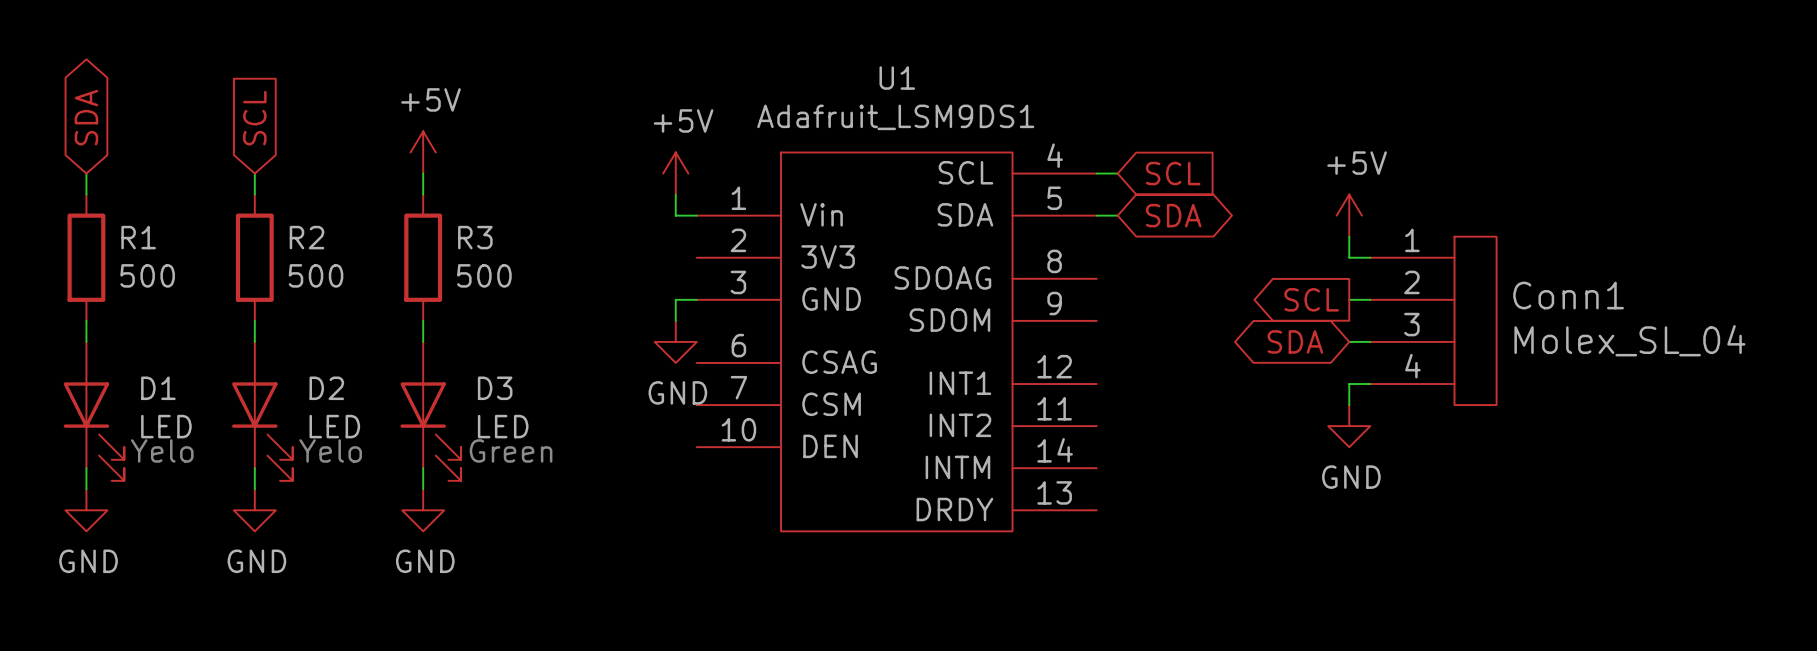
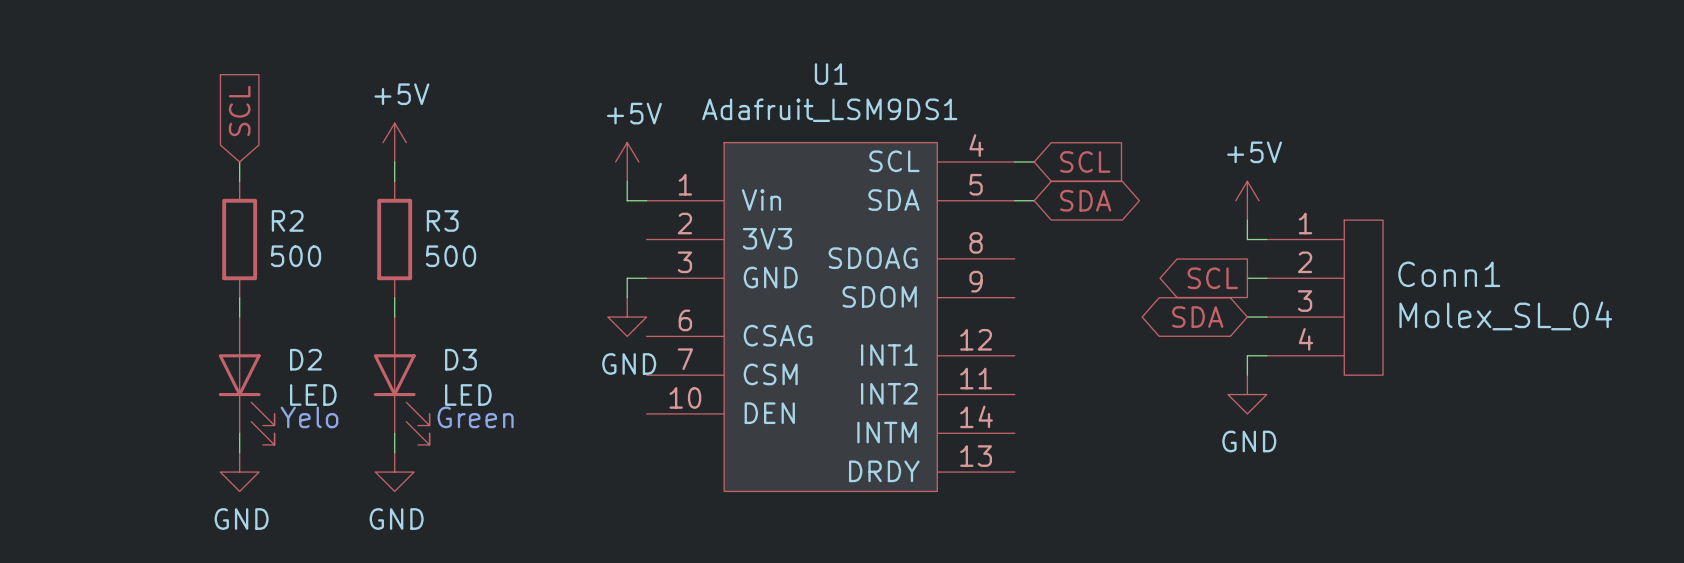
global label: SDA (86, 117) -> none
wire: (86, 173) (86, 194) -> none
R1: 500 (86, 257) -> none
wire: (86, 320) (86, 341) -> none
D1: LED (94, 411) -> none
text: Yelo (162, 450) -> none
wire: (86, 468) (86, 489) -> none
power symbol: GND (86, 510) -> none

